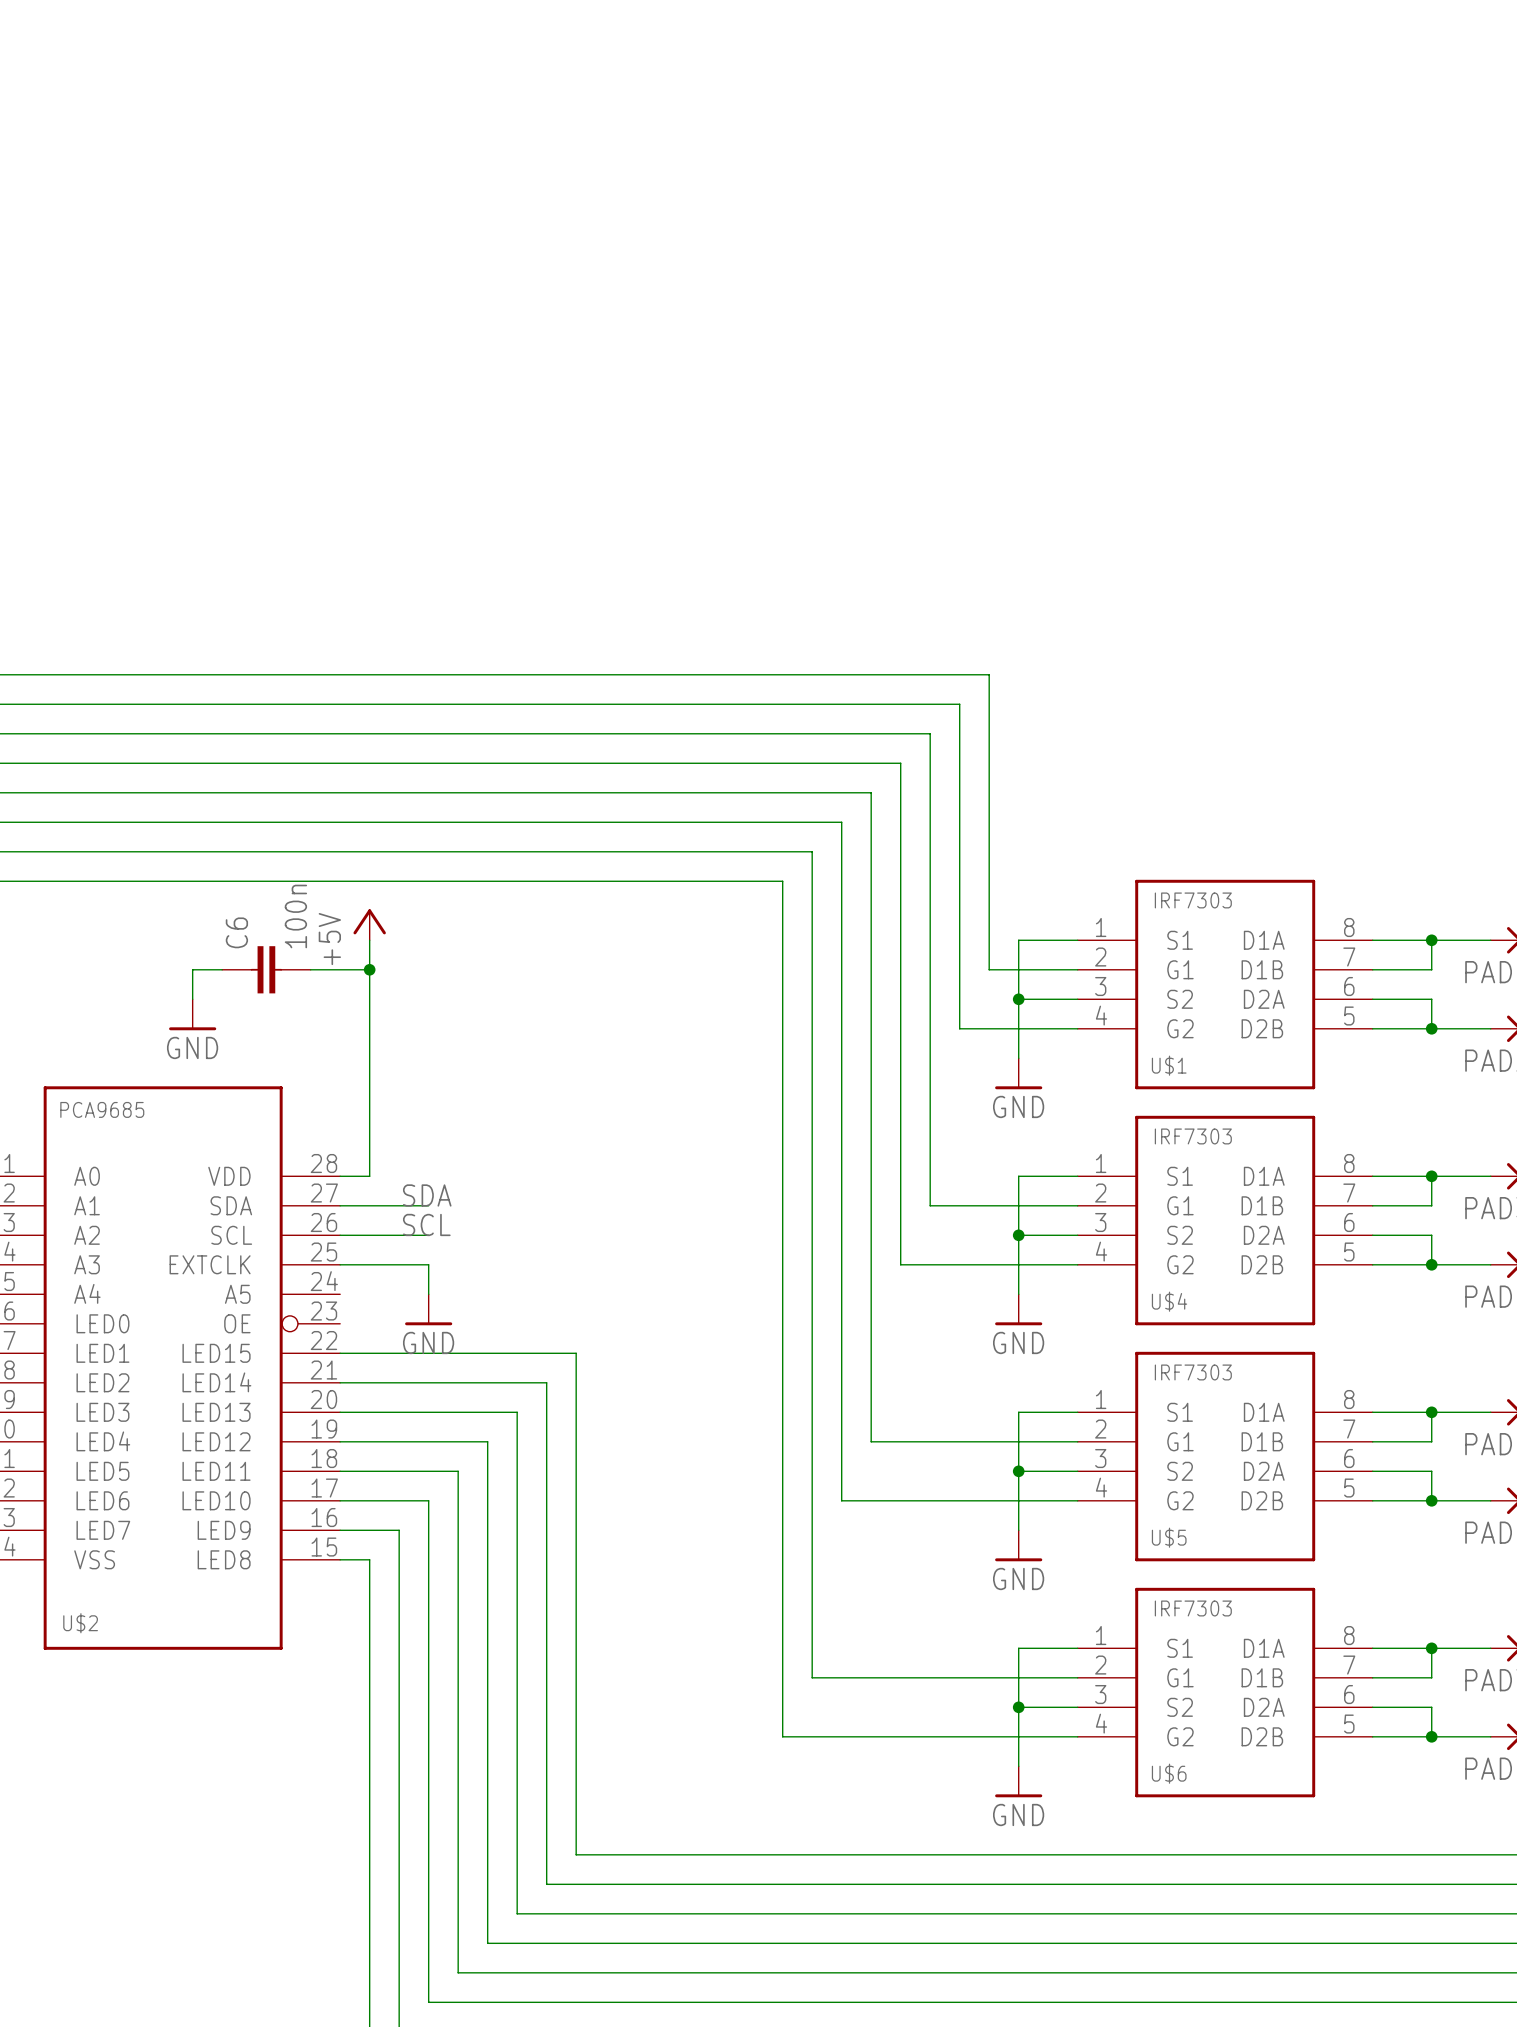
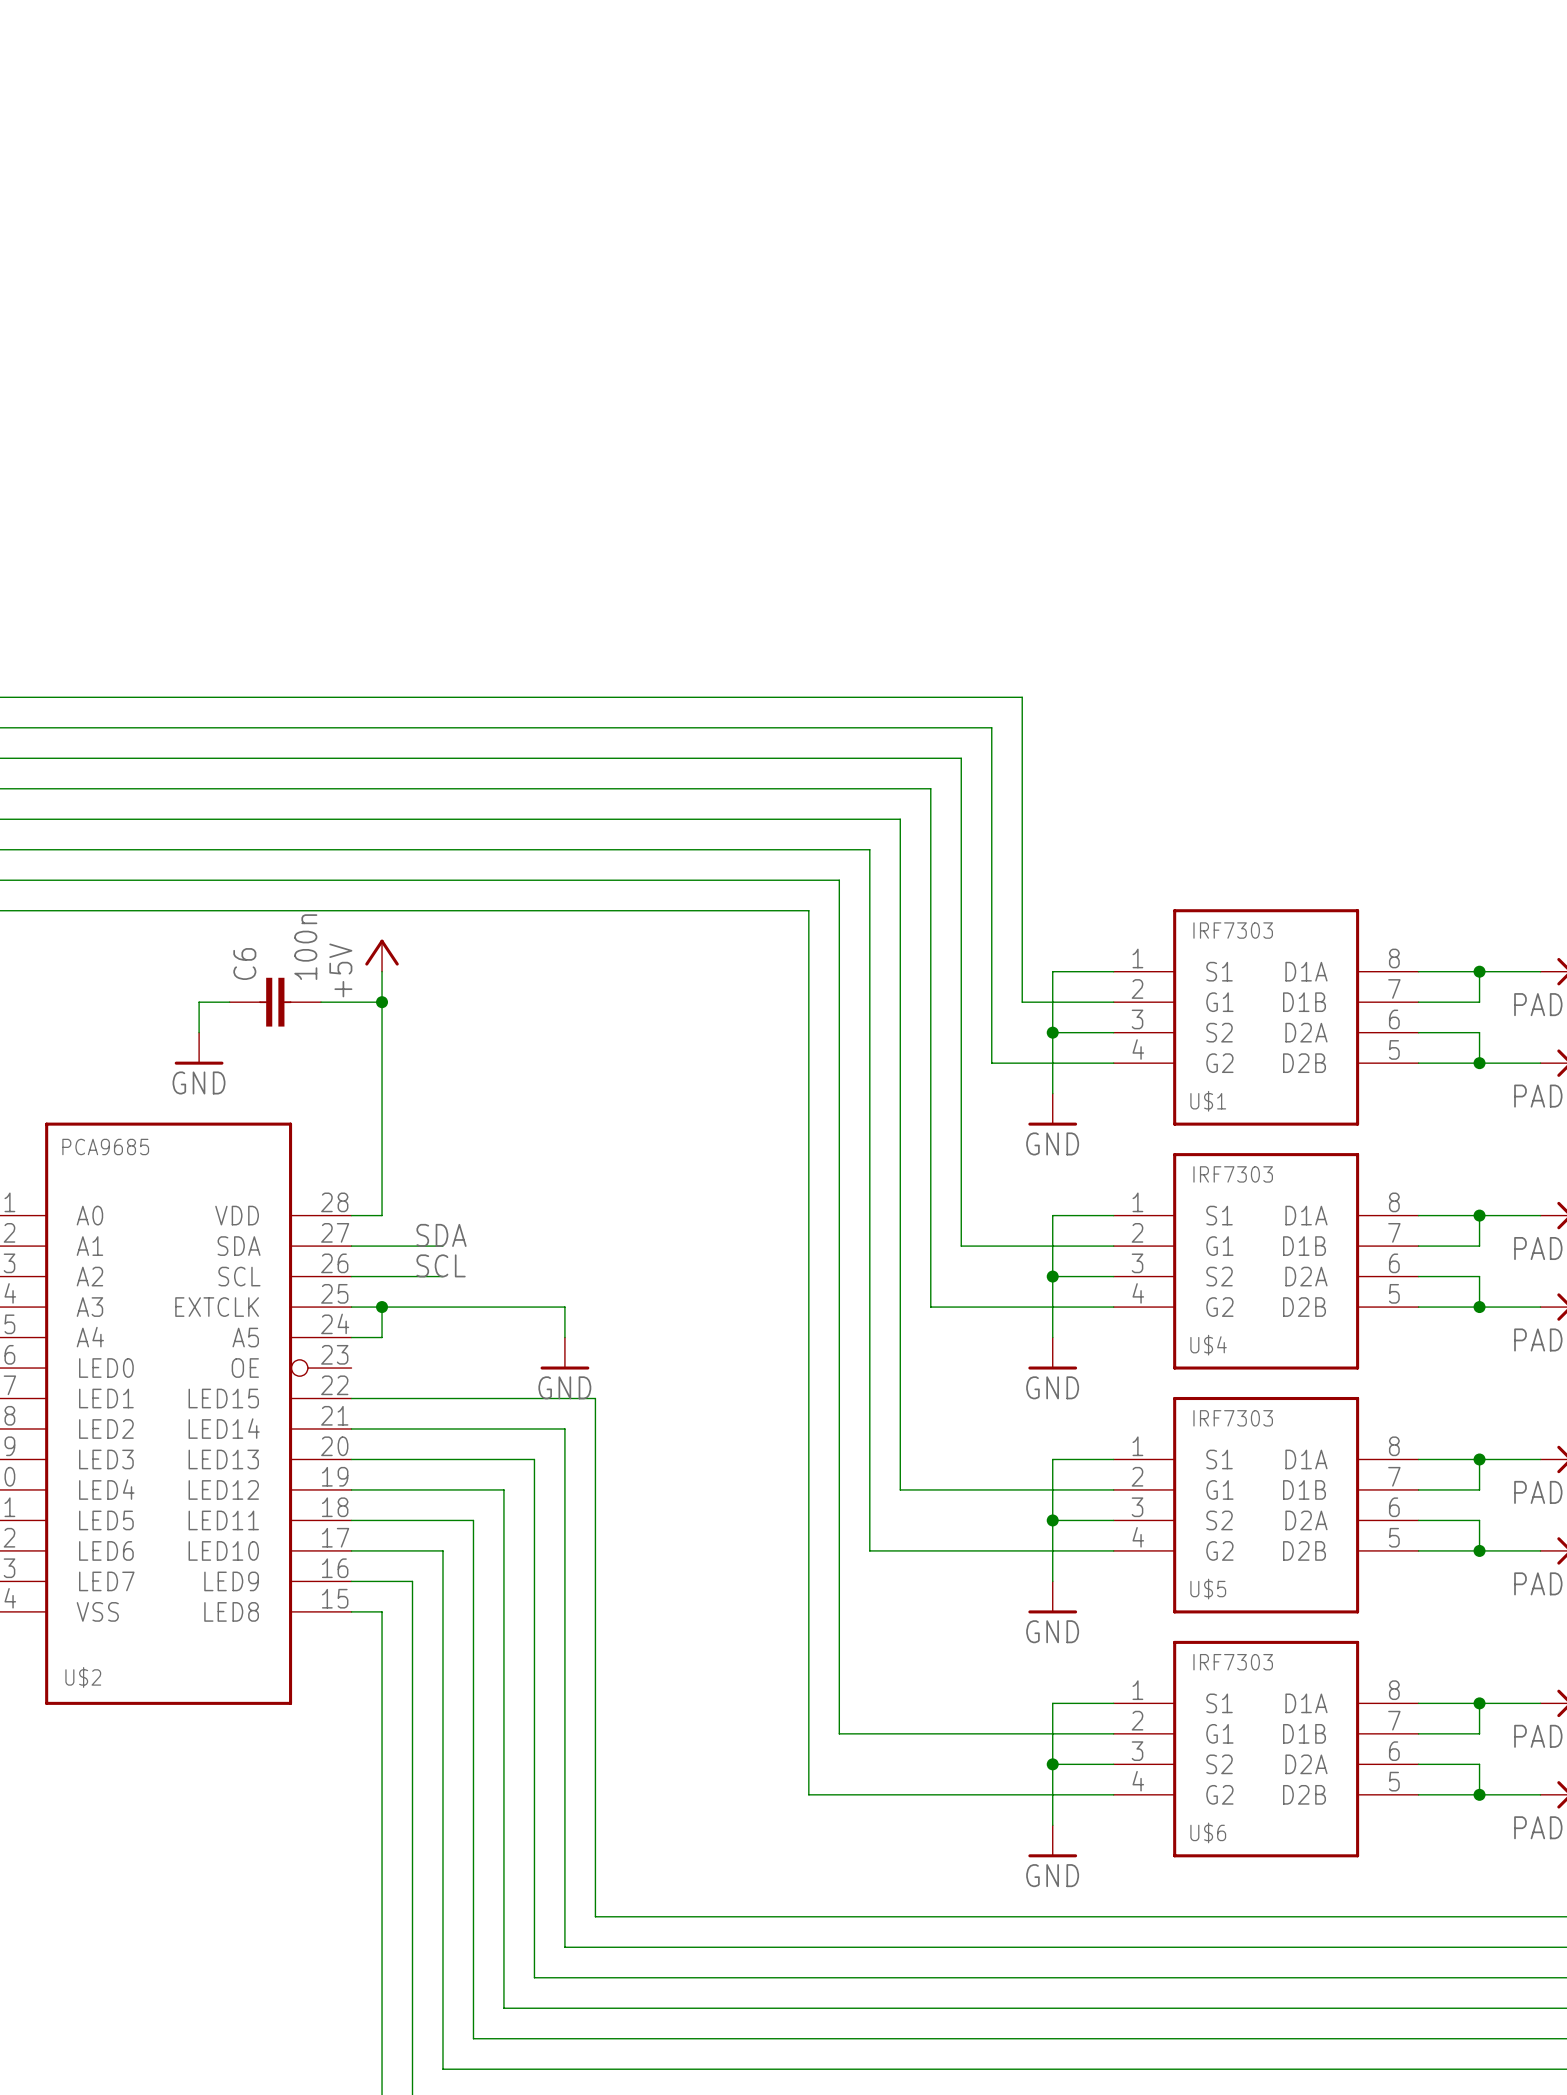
wire: none -> (382, 1307) (382, 1337) (351, 1337)
junction: none -> (382, 1307)
wire: (428, 1264) (428, 1294) -> (442, 1307) (564, 1307) (564, 1337)
power symbol position: GND (428, 1309) -> GND (564, 1353)

